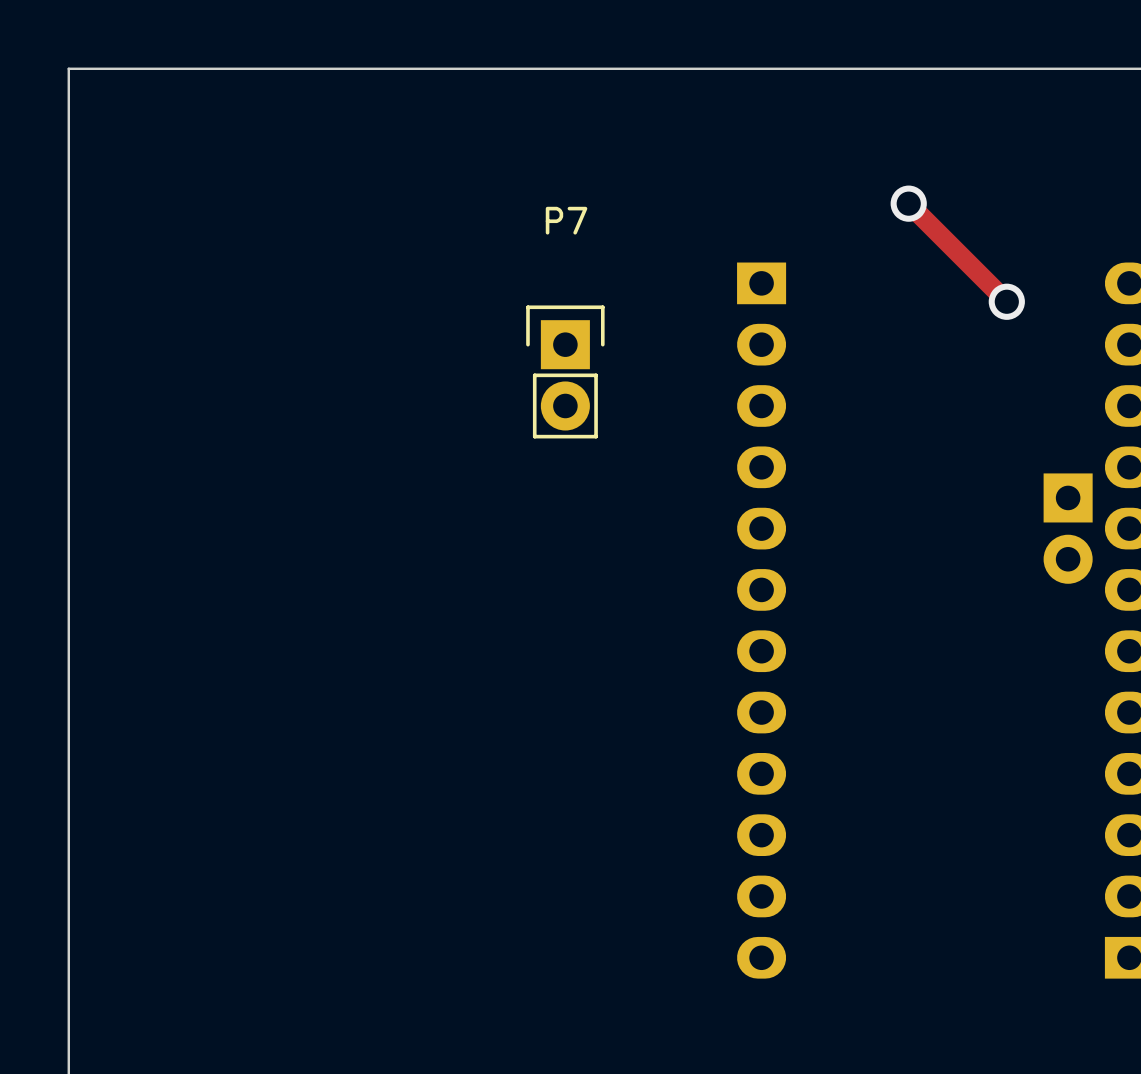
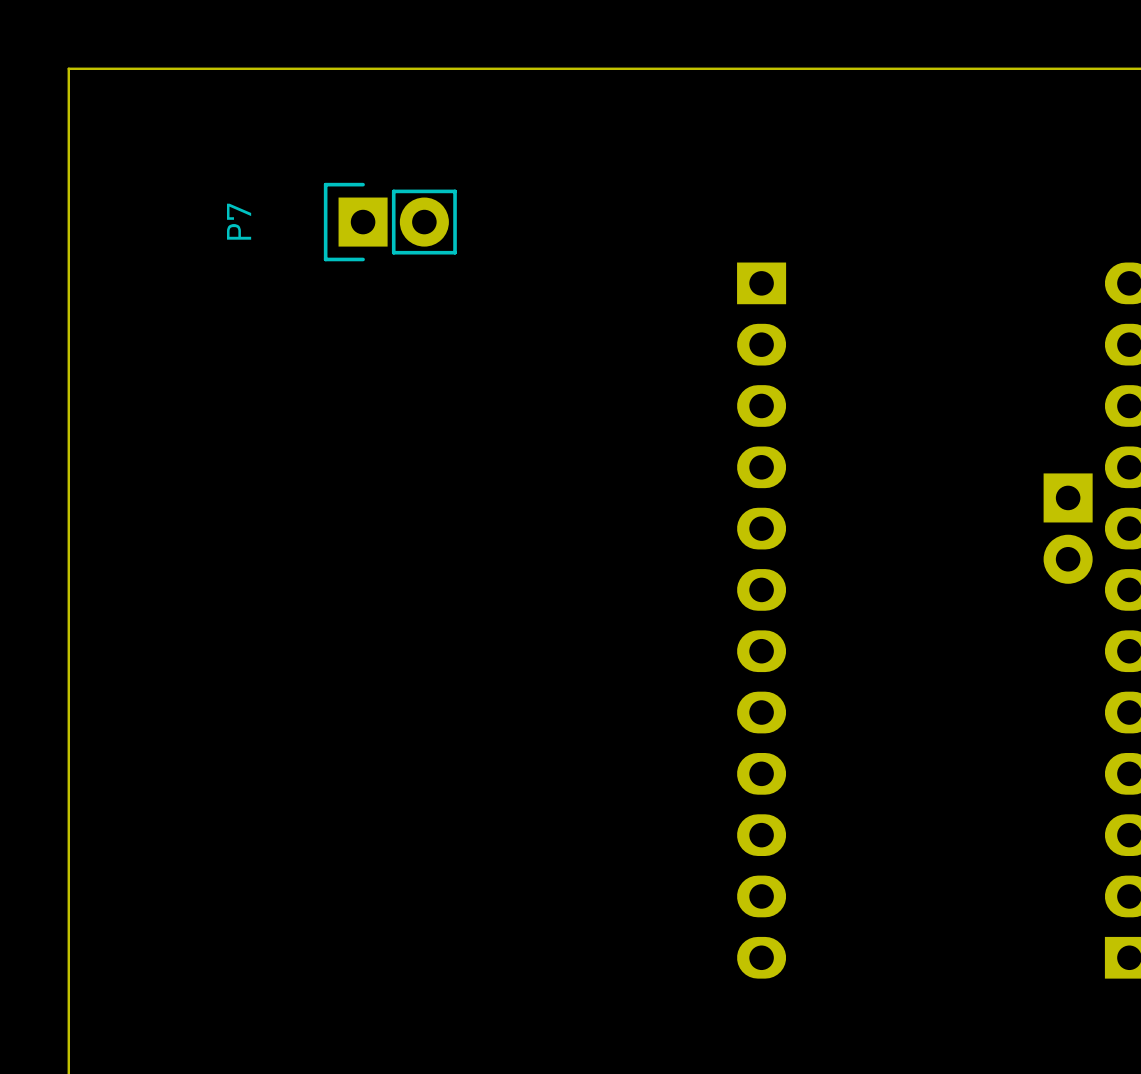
track: (908, 203) (1006, 301) -> none
via: (908, 203) -> none
via: (1006, 301) -> none
P7 rotation: 0° (565, 371) -> 90° counterclockwise (390, 222)
P7 position: (565, 371) -> (390, 222)

